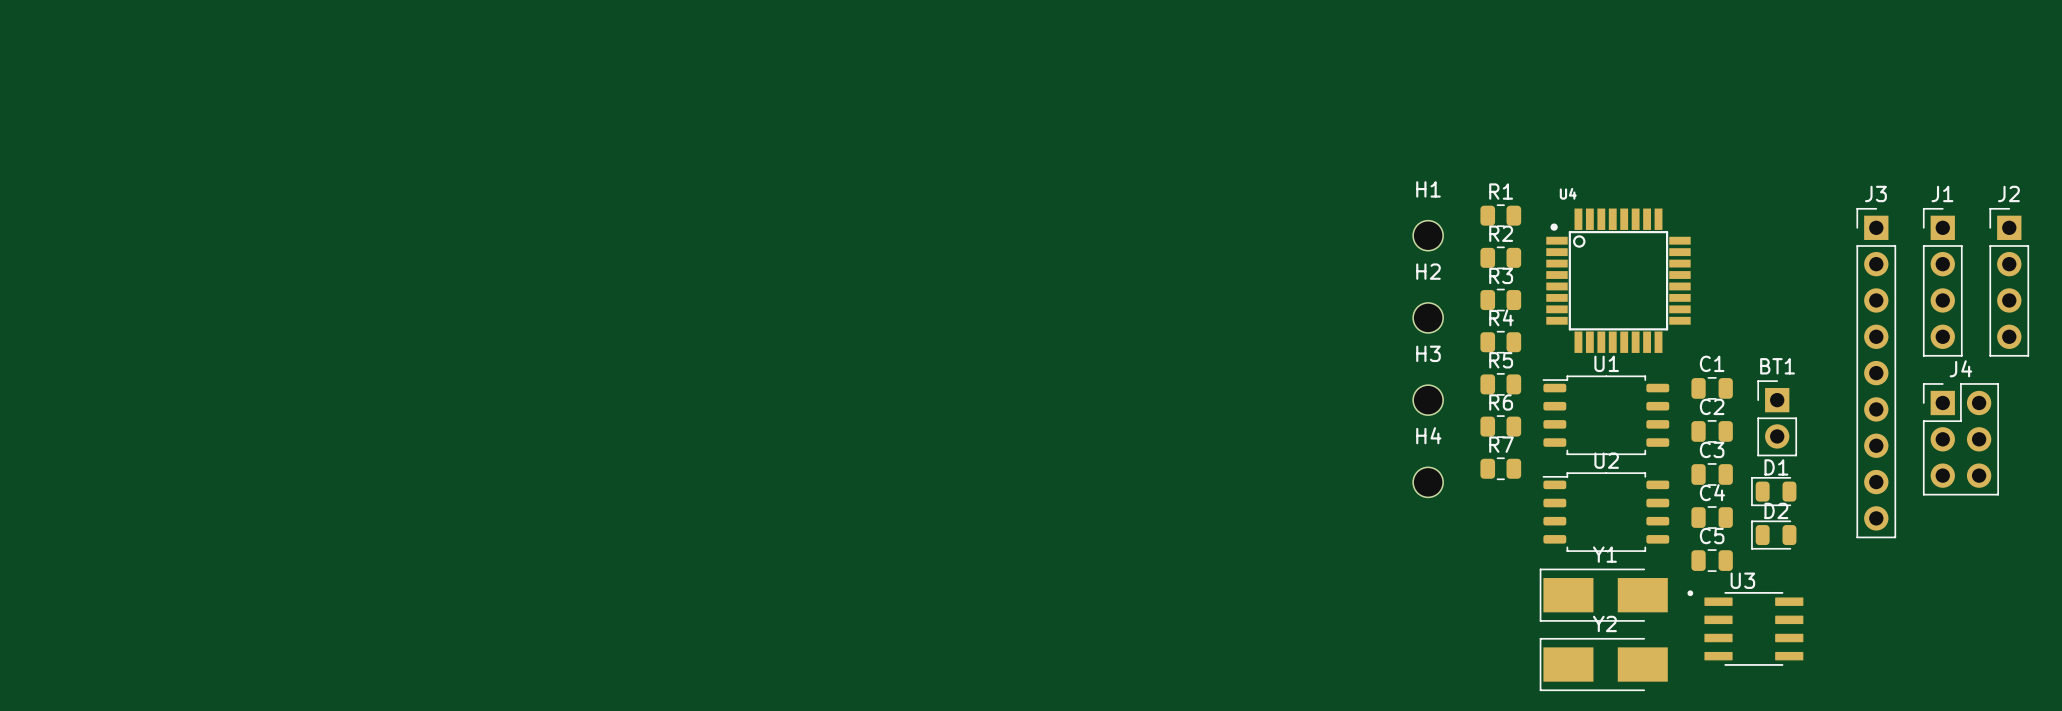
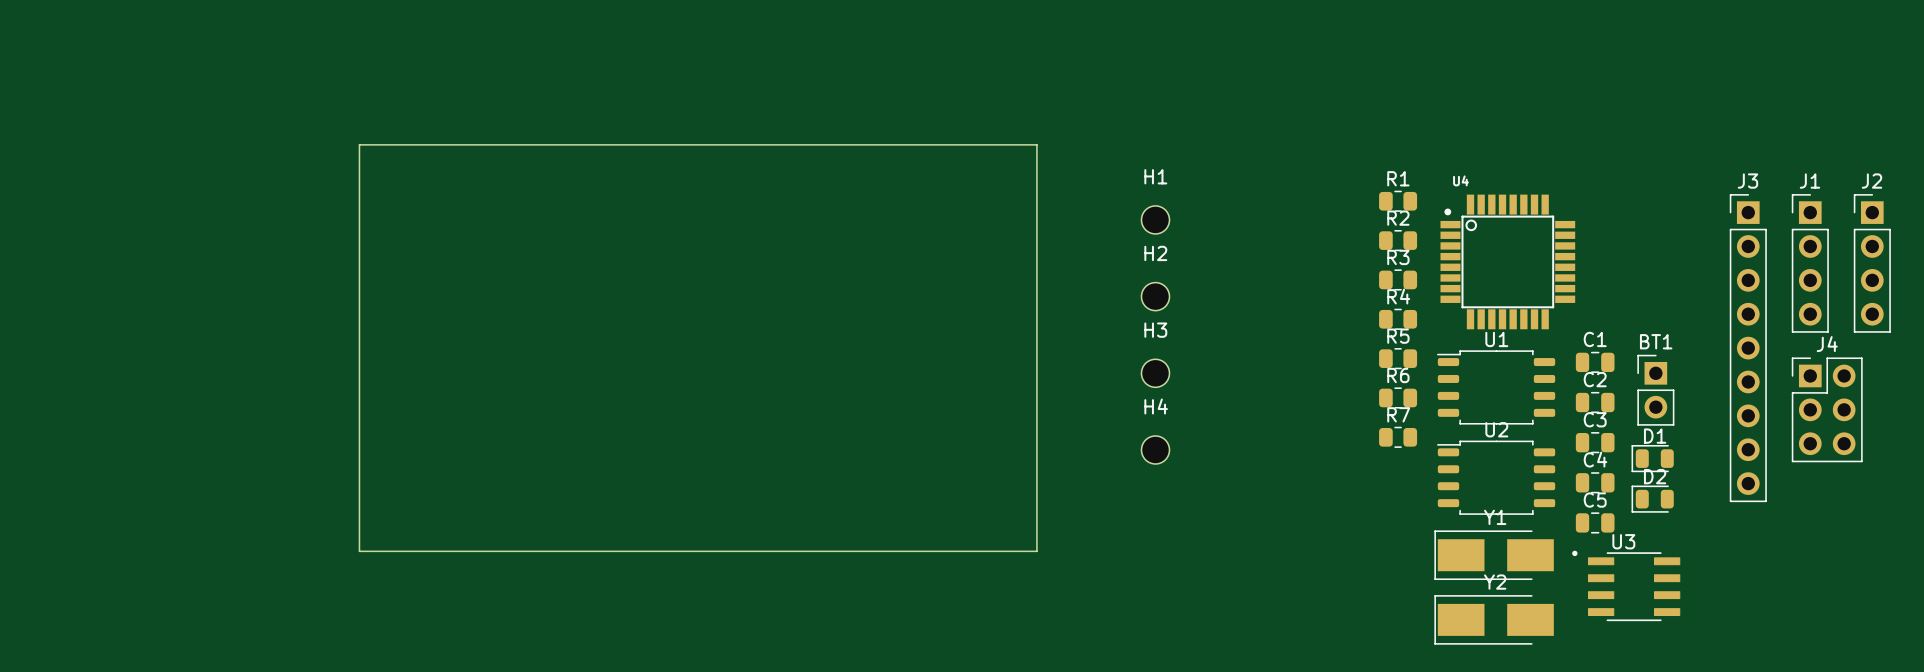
board edge: none -> (359, 144) (1036, 144) (1036, 551) (359, 551) (359, 144)
H1 position: (1428, 235) -> (1155, 219)
H2 position: (1428, 317) -> (1155, 296)
H3 position: (1428, 400) -> (1155, 373)
H4 position: (1428, 482) -> (1155, 449)

